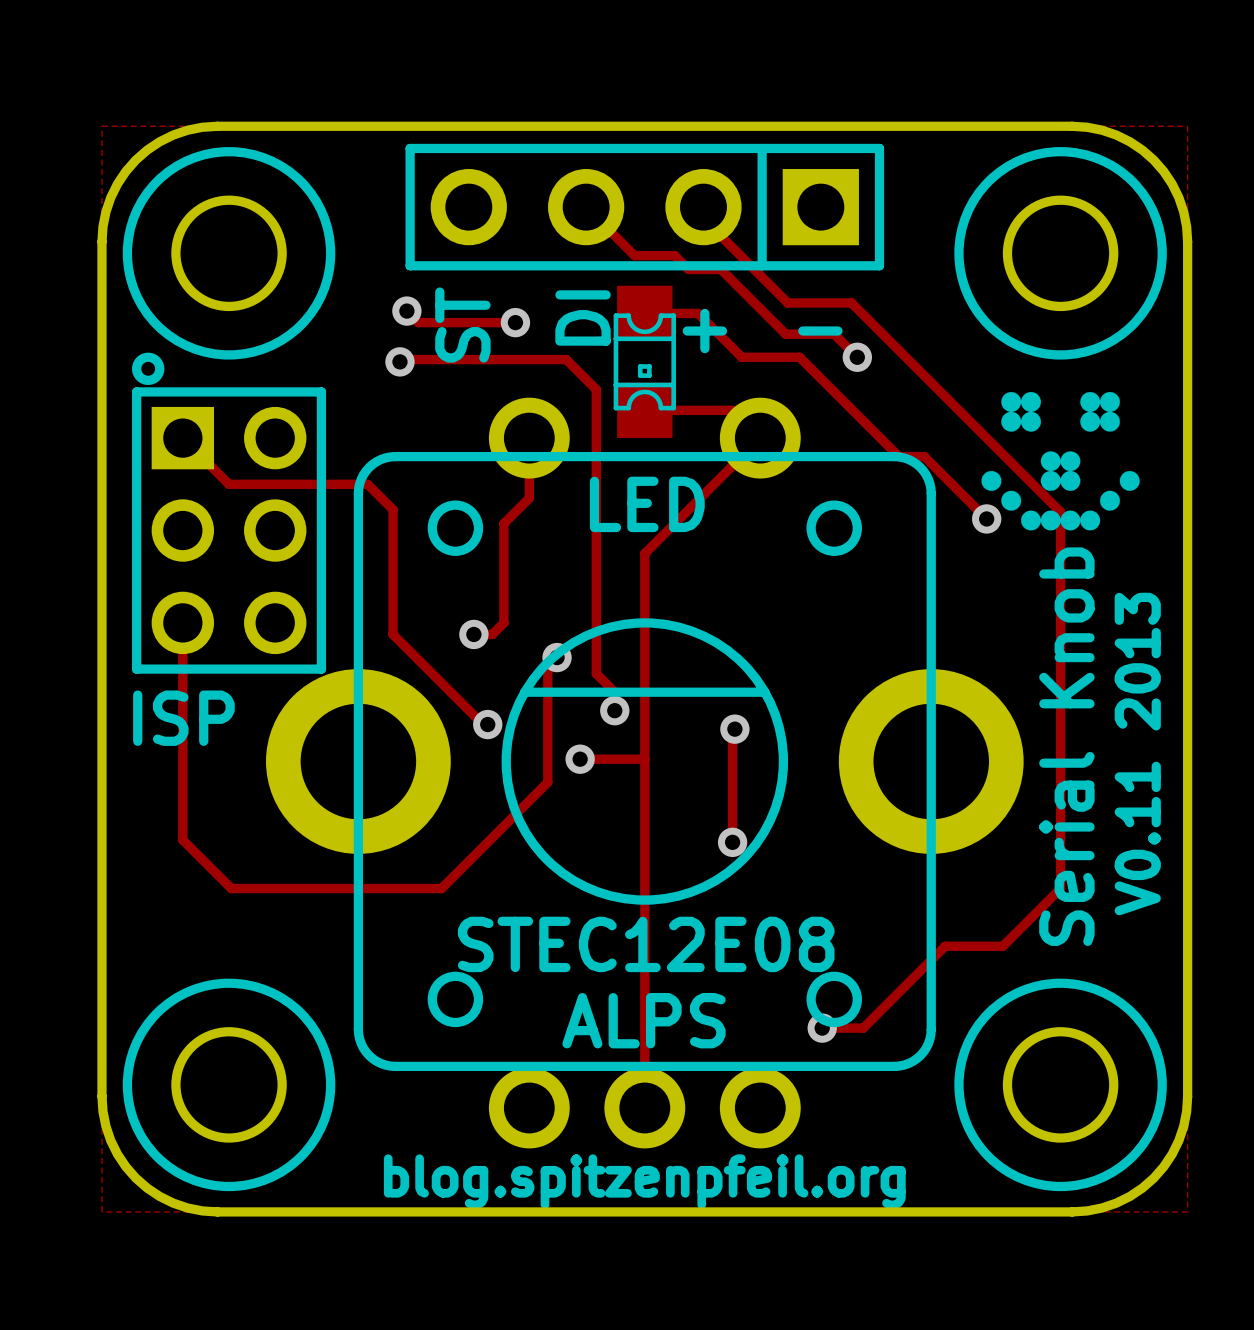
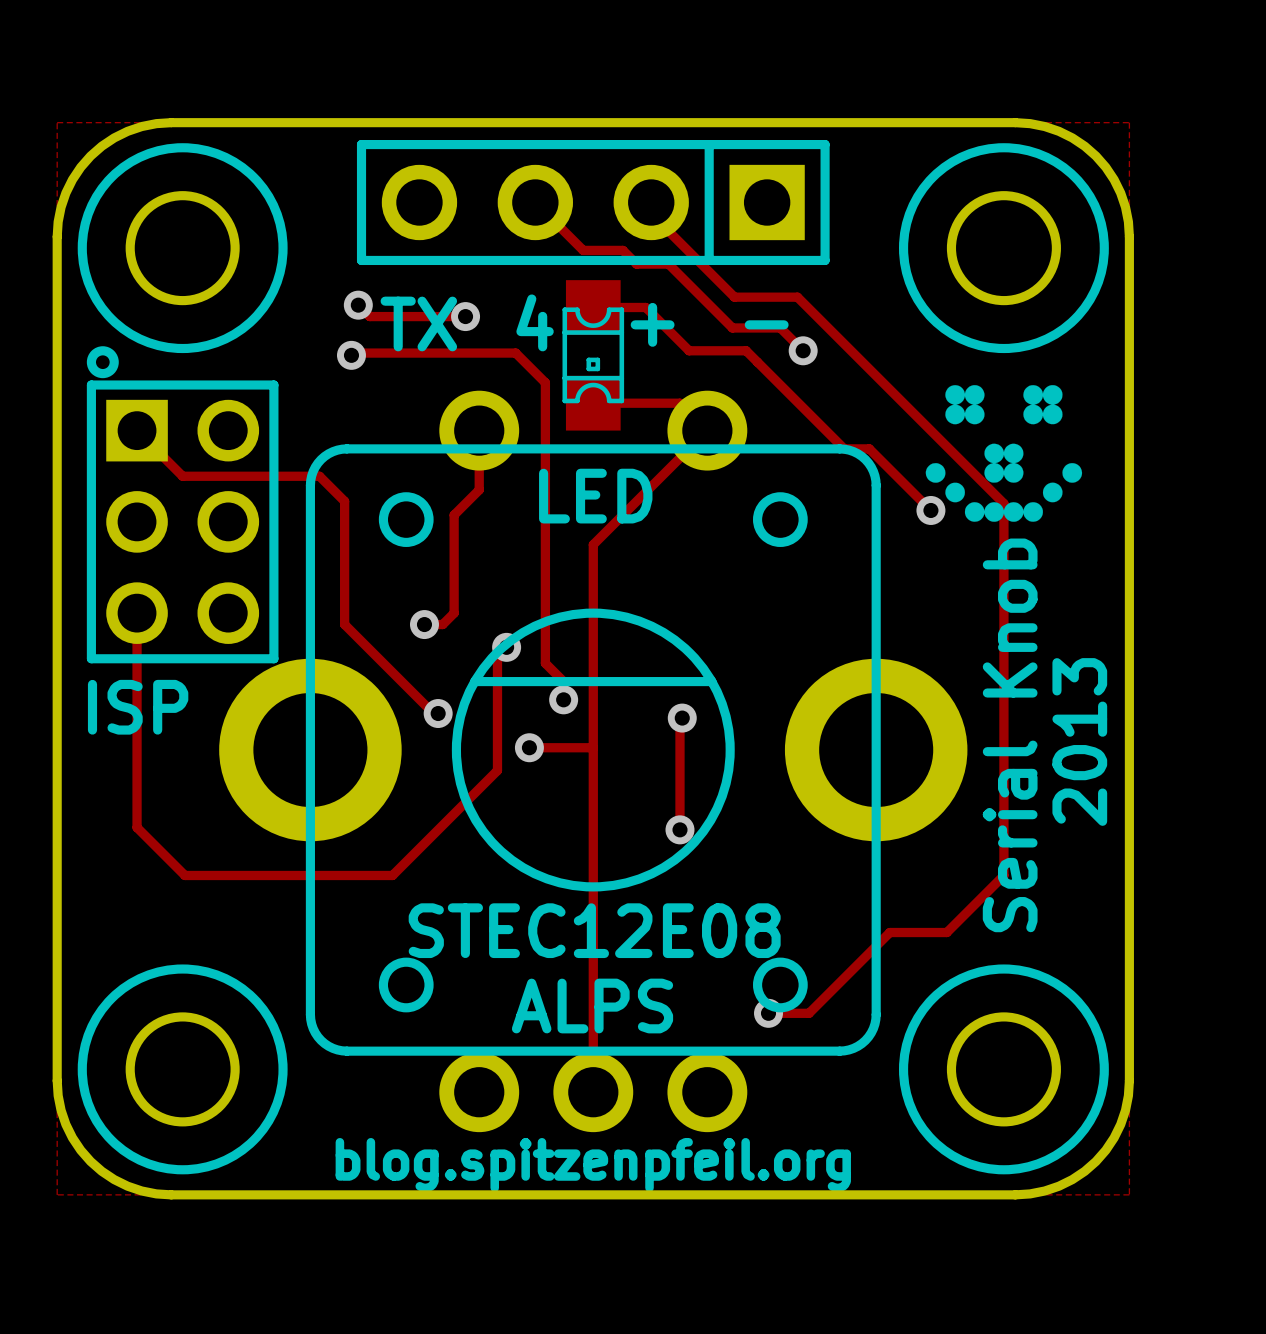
text: DI (583, 318) -> 4 (535, 322)
text: ST (462, 325) -> TX (418, 323)
text: V0.11 2013 (1137, 754) -> 2013 (1079, 741)

